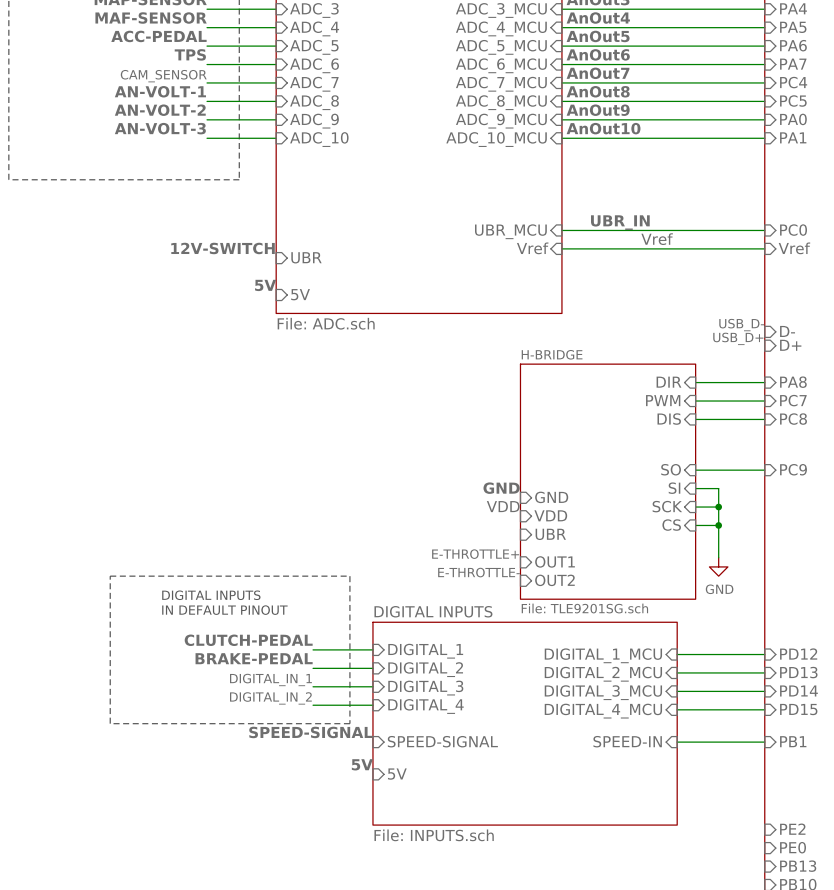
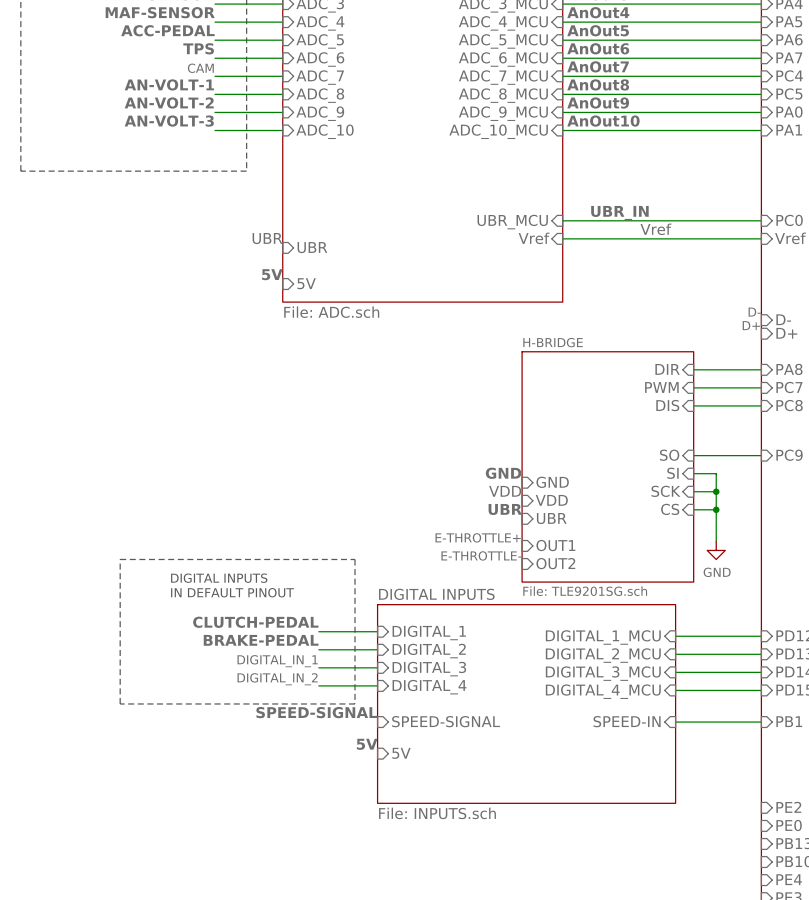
label: CAM_SENSOR (163, 76) -> CAM (200, 68)
label: 12V-SWITCH (223, 248) -> UBR (267, 238)
label: USB_D- (741, 325) -> D- (754, 312)
label: USB_D+ (738, 338) -> D+ (751, 325)
label: none -> UBR (505, 509)

